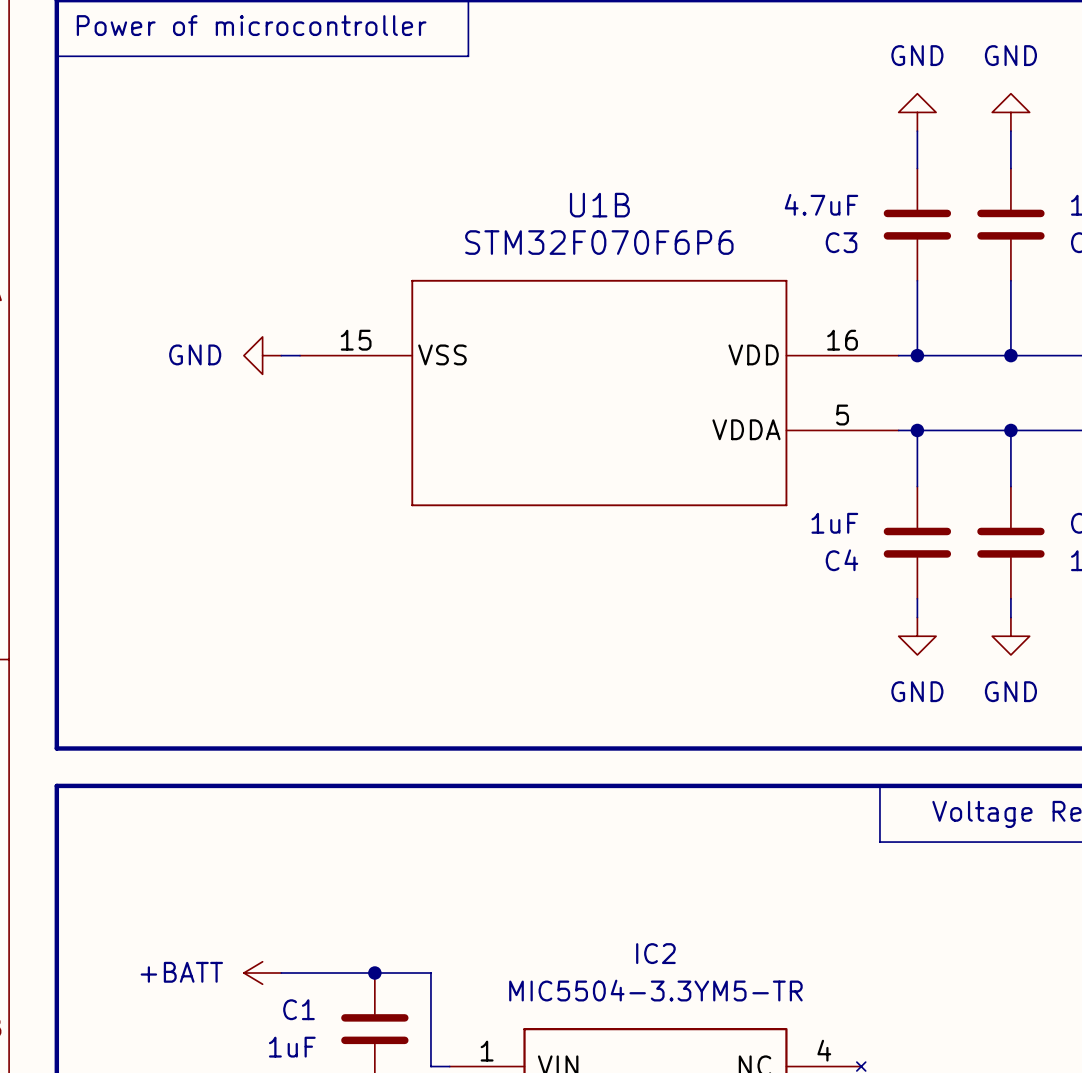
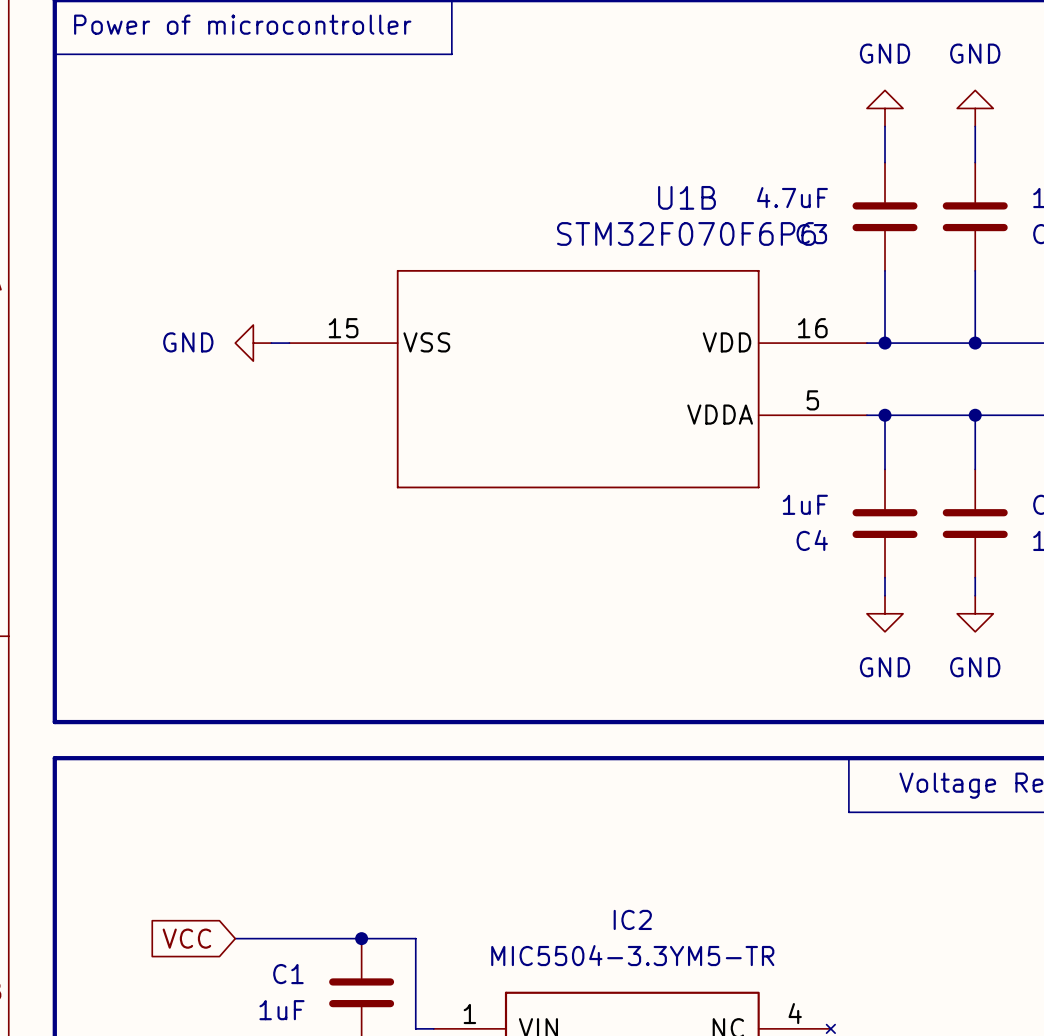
U1B name position: U1B (599, 205) -> U1B (686, 197)
U1B value position: STM32F070F6P6 (599, 242) -> STM32F070F6P6 (686, 233)
global label: none -> VCC (186, 938)
power symbol: +BATT (262, 973) -> none

